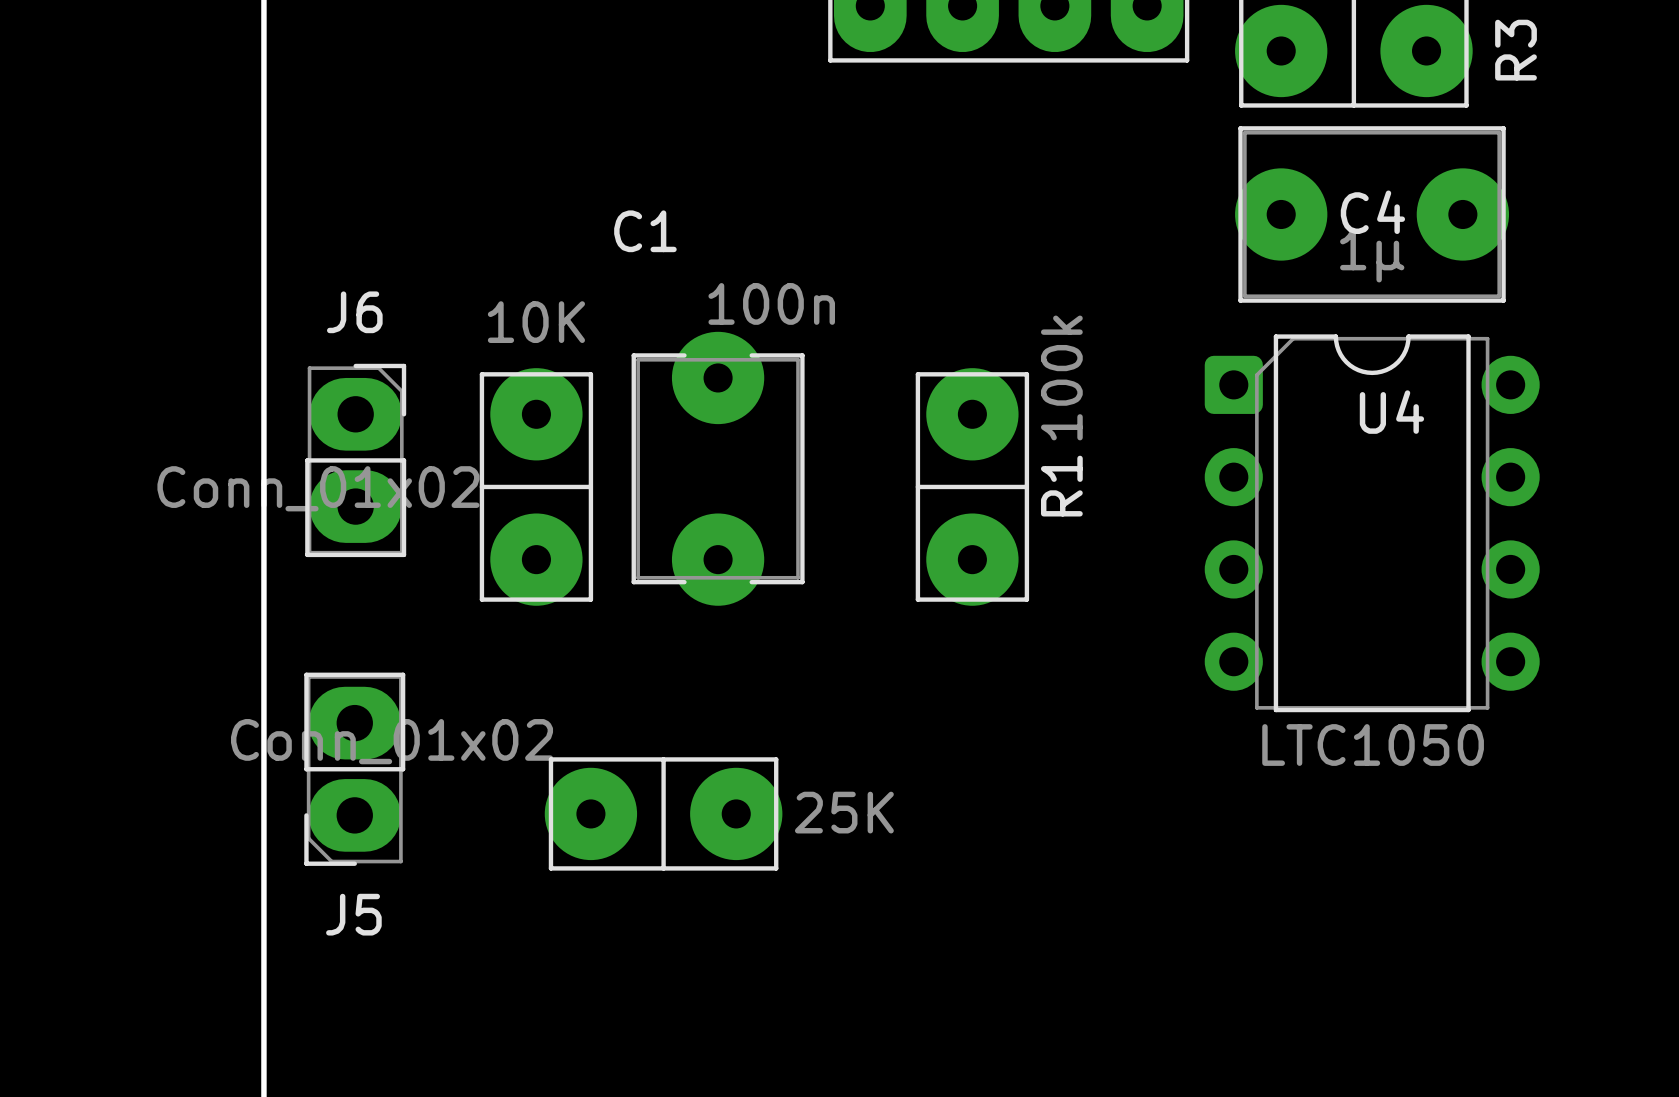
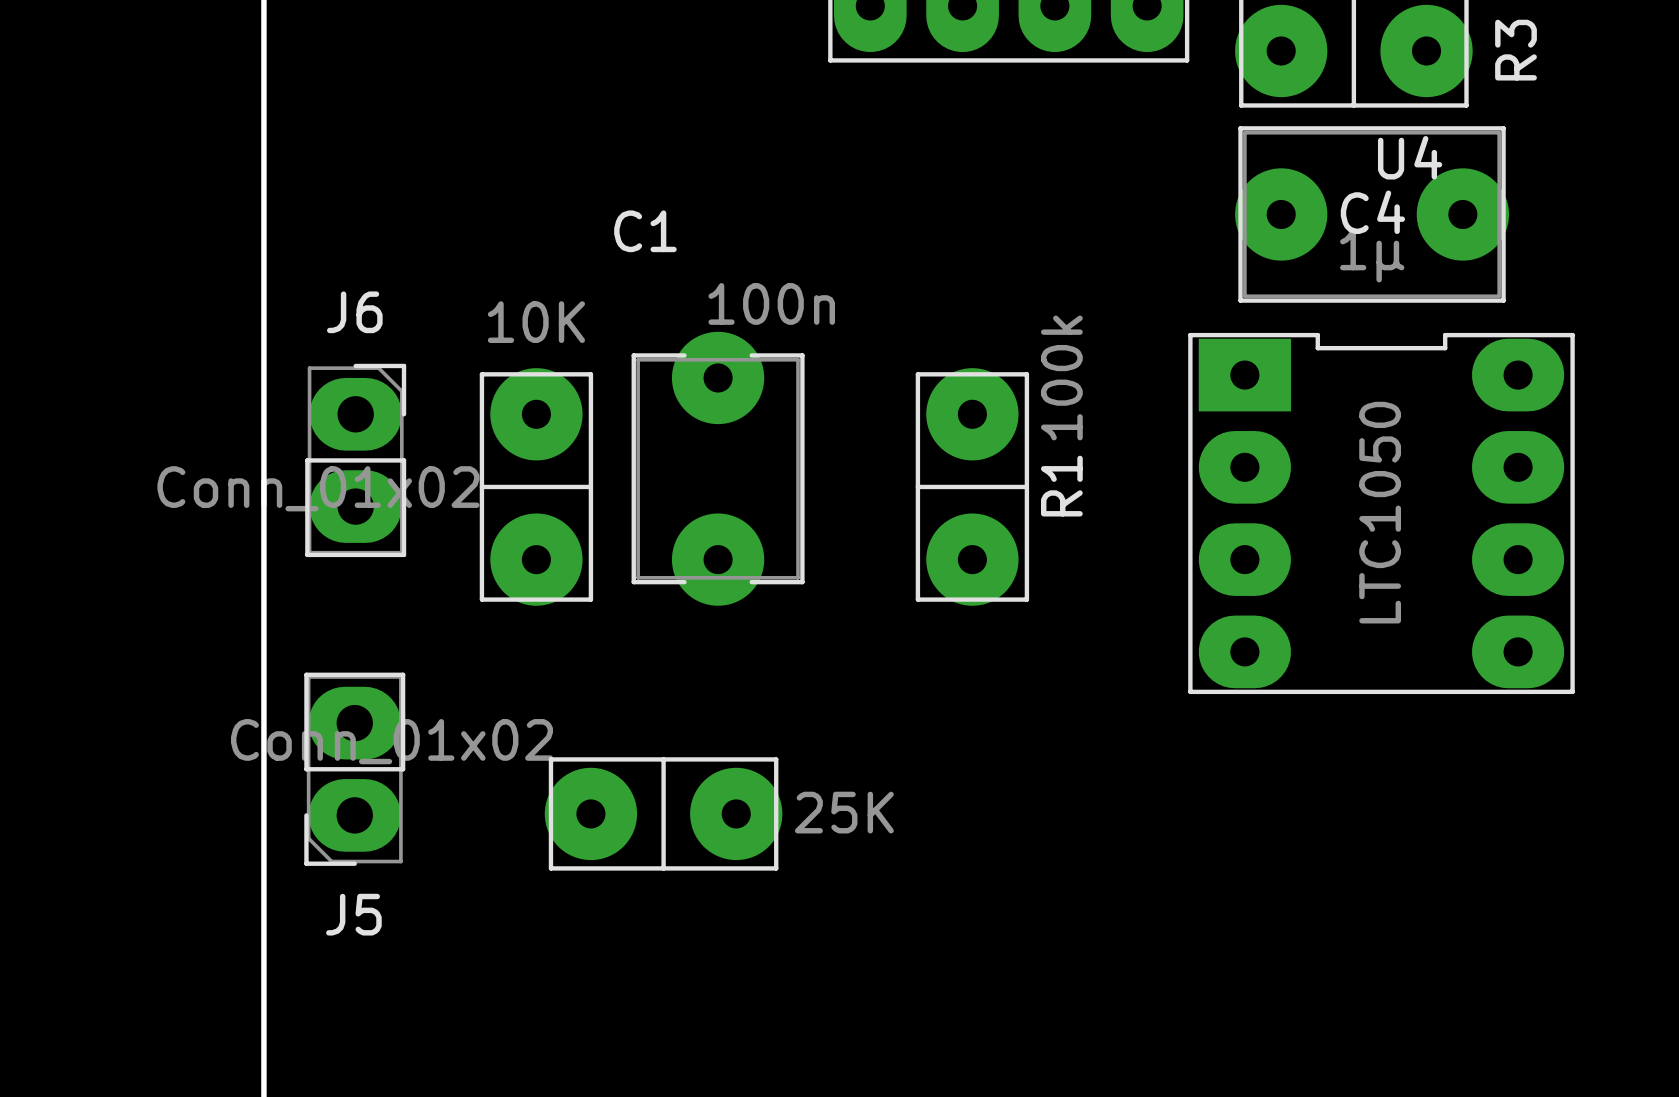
U4 footprint: [1204, 334, 1540, 713] -> [1188, 332, 1575, 695]
U4 name position: U4 (1391, 412) -> U4 (1410, 157)
U4 value position: LTC1050 (1373, 745) -> LTC1050 (1380, 512)

